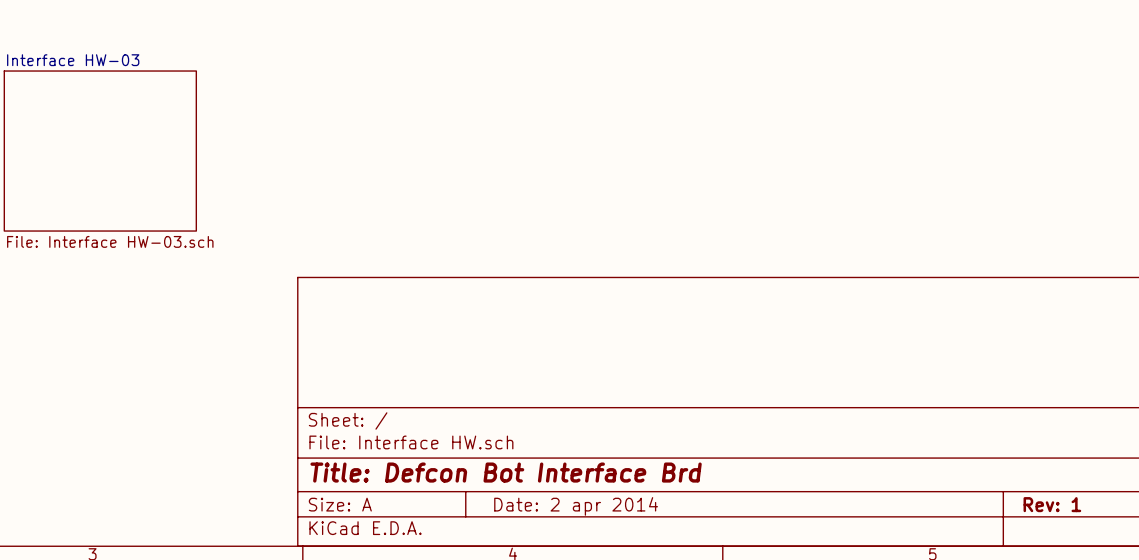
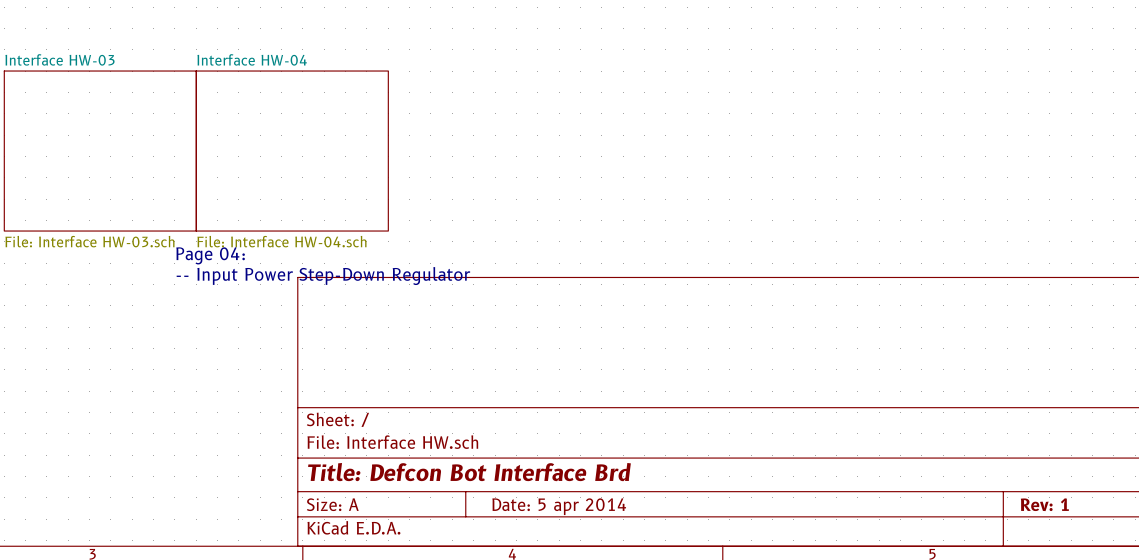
sheet Interface HW-04: none -> File: Interface HW-04.sch (292, 151)
text: none -> Page 04: (210, 255)
text: none -> -- Input Power Step-Down Regulator (323, 276)
title block: Date: 2 apr 2014 (576, 506) -> Date: 5 apr 2014 (559, 506)

